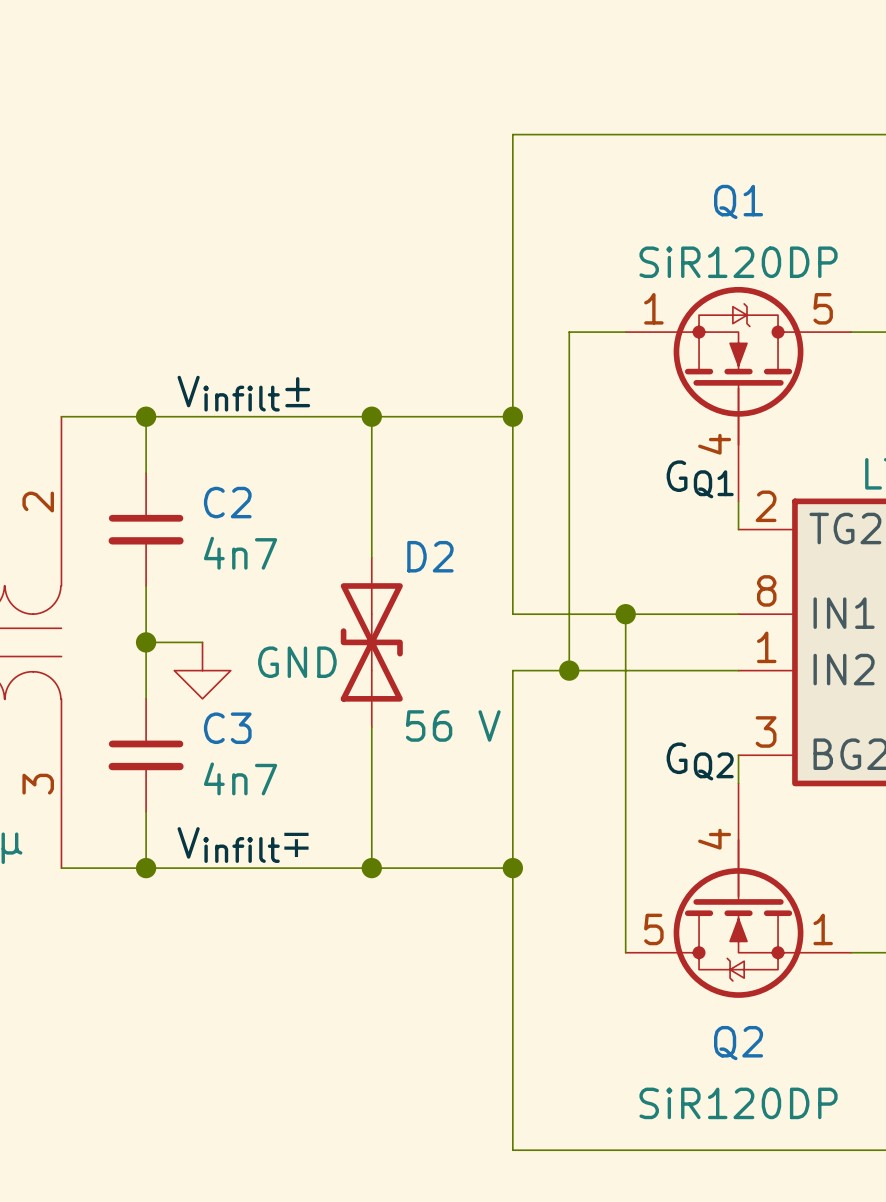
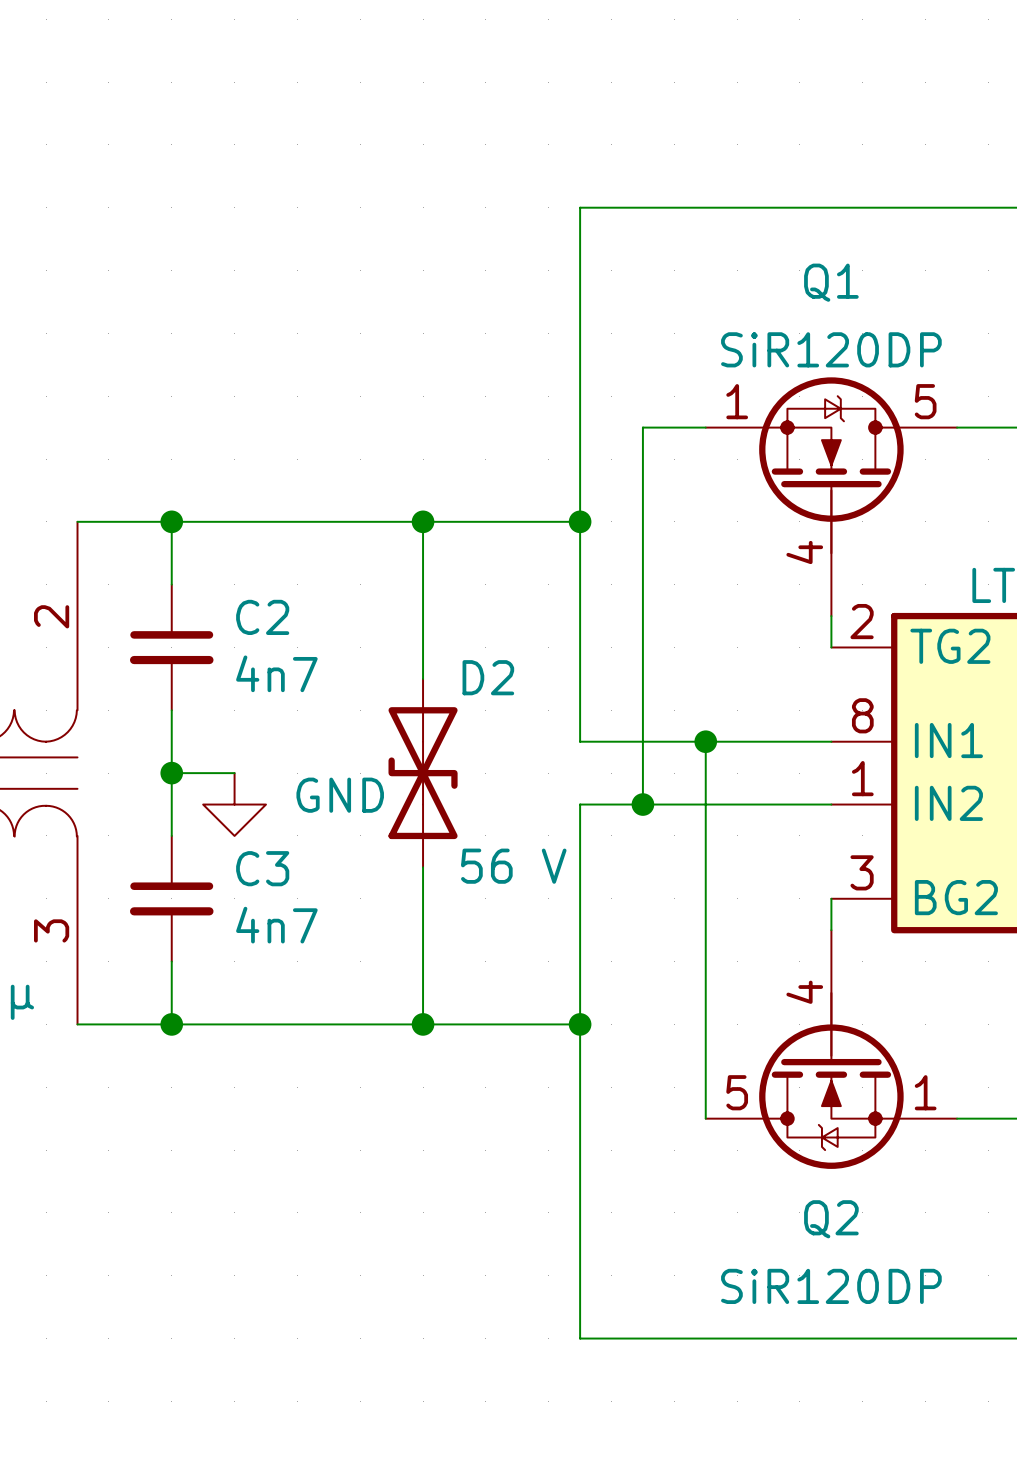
label: Vinfilt± (243, 393) -> none
label: GQ1 (700, 479) -> none
label: GQ2 (700, 761) -> none
label: Vinfilt∓ (243, 845) -> none

